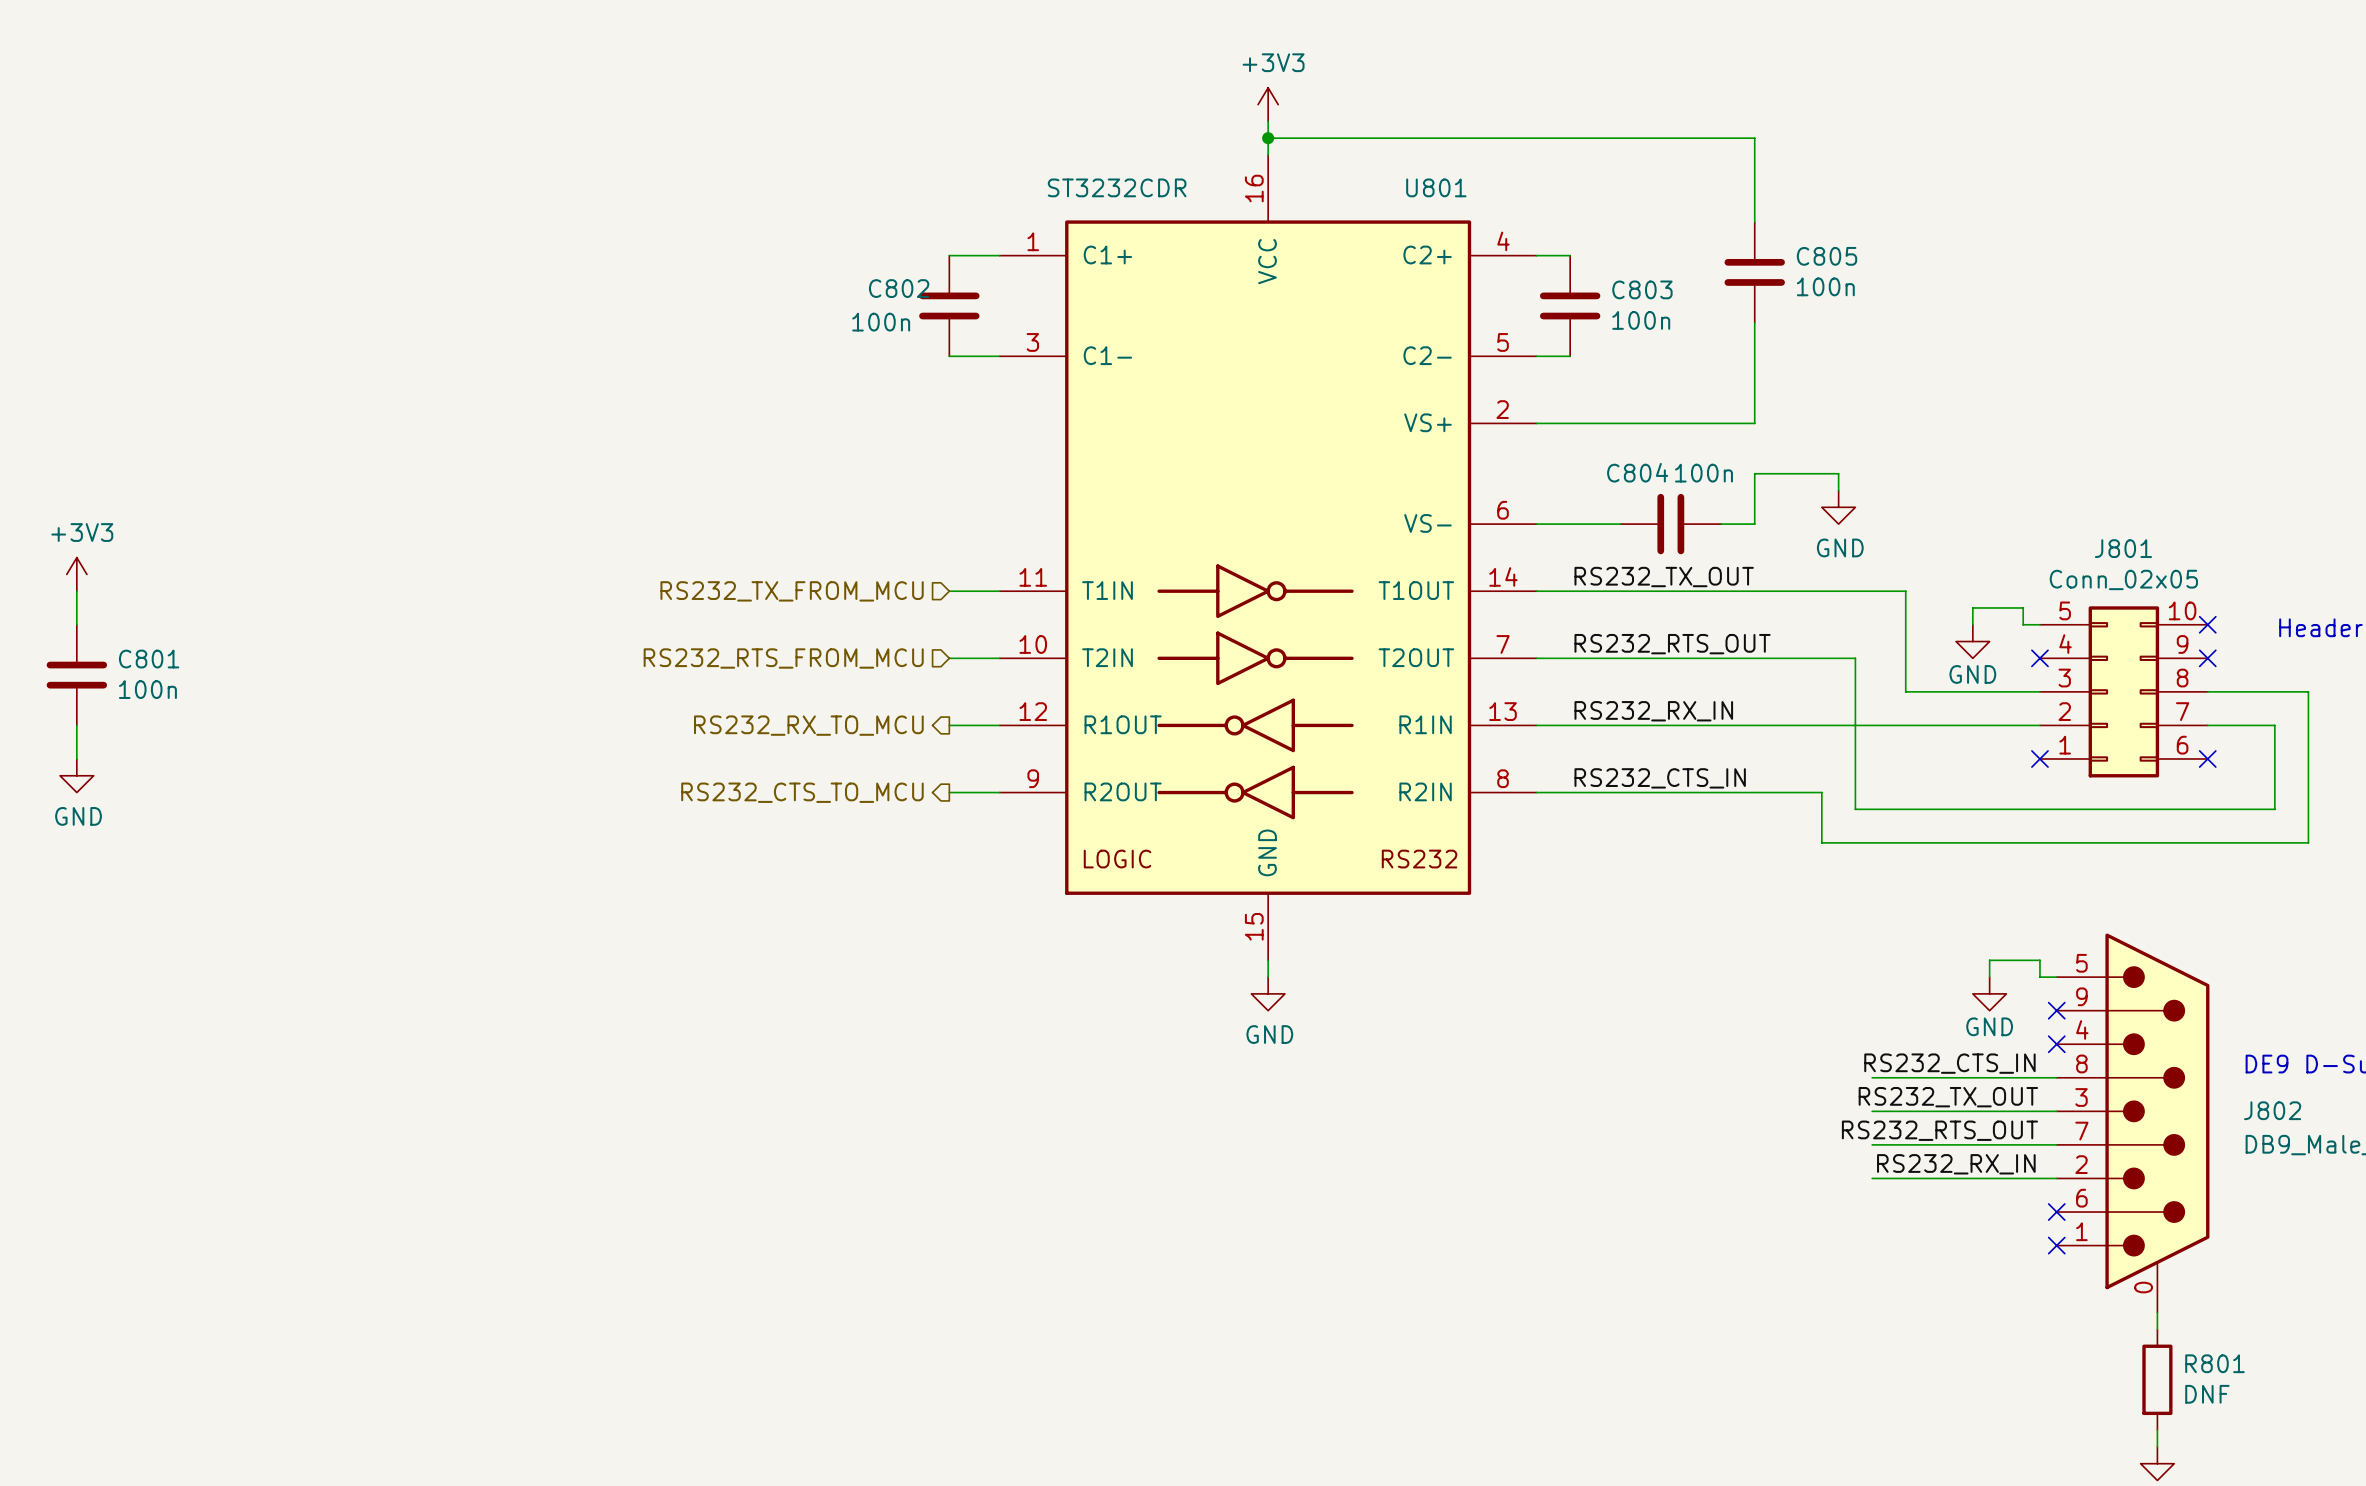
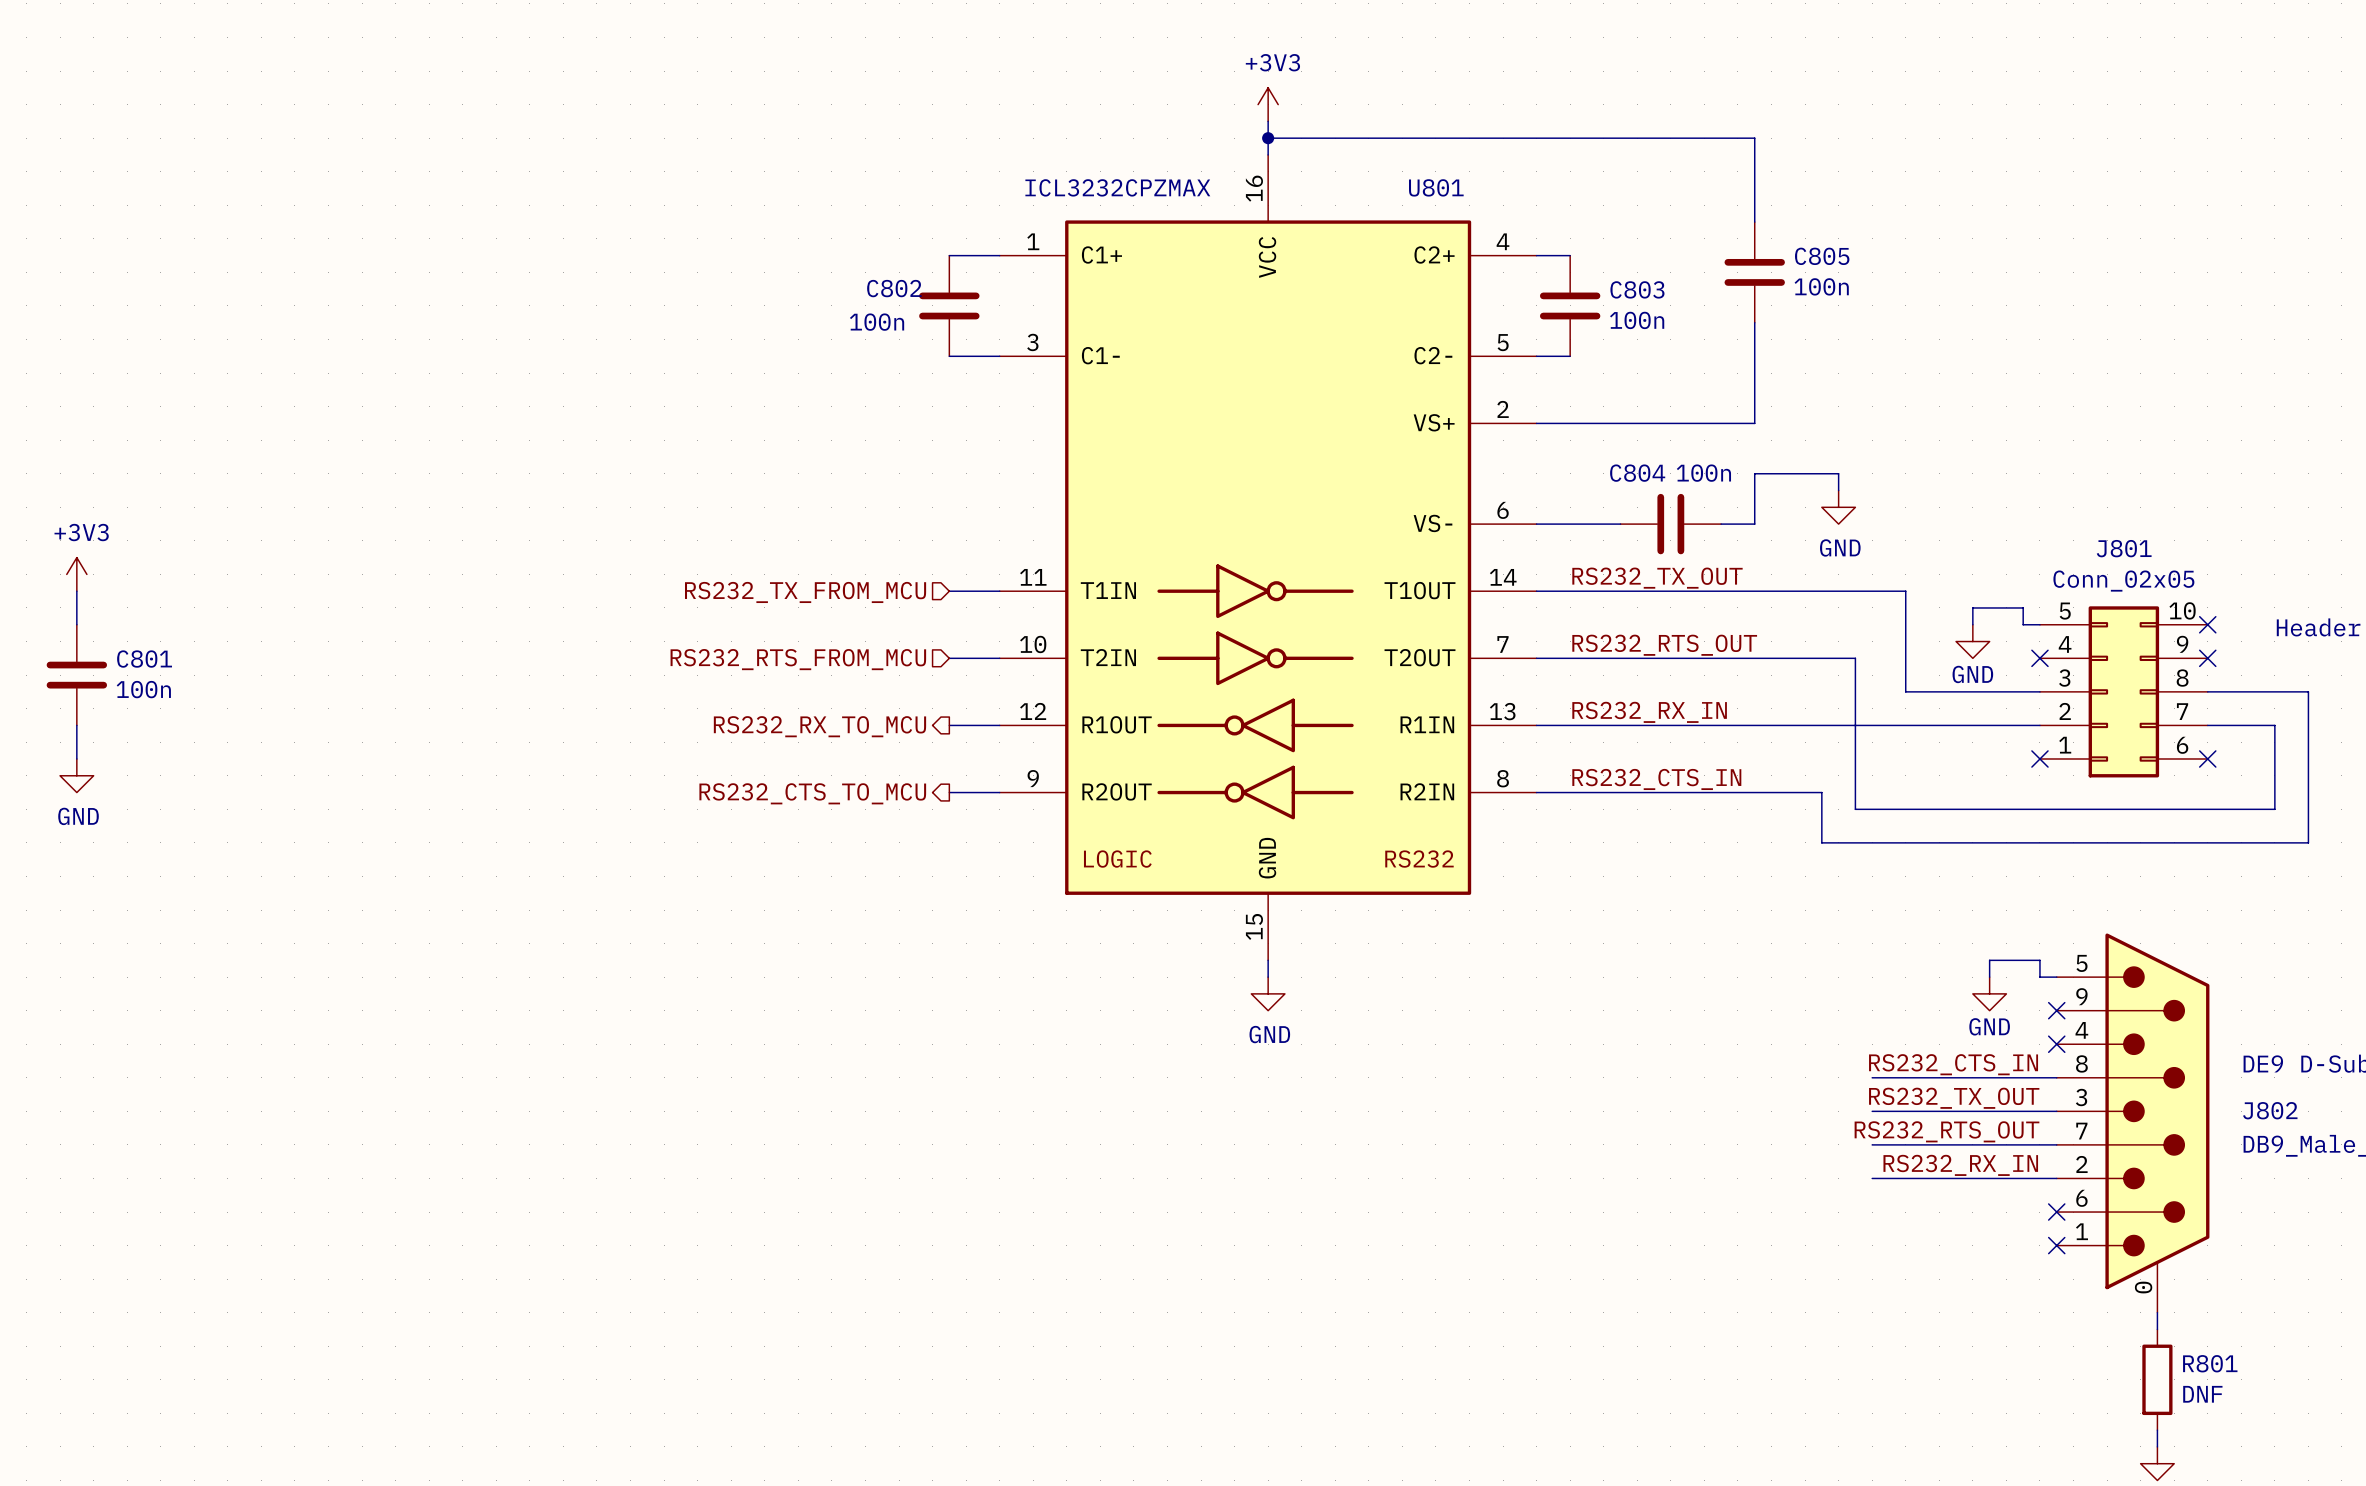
U801 value: ST3232CDR (1117, 187) -> ICL3232CPZMAX (1117, 187)

